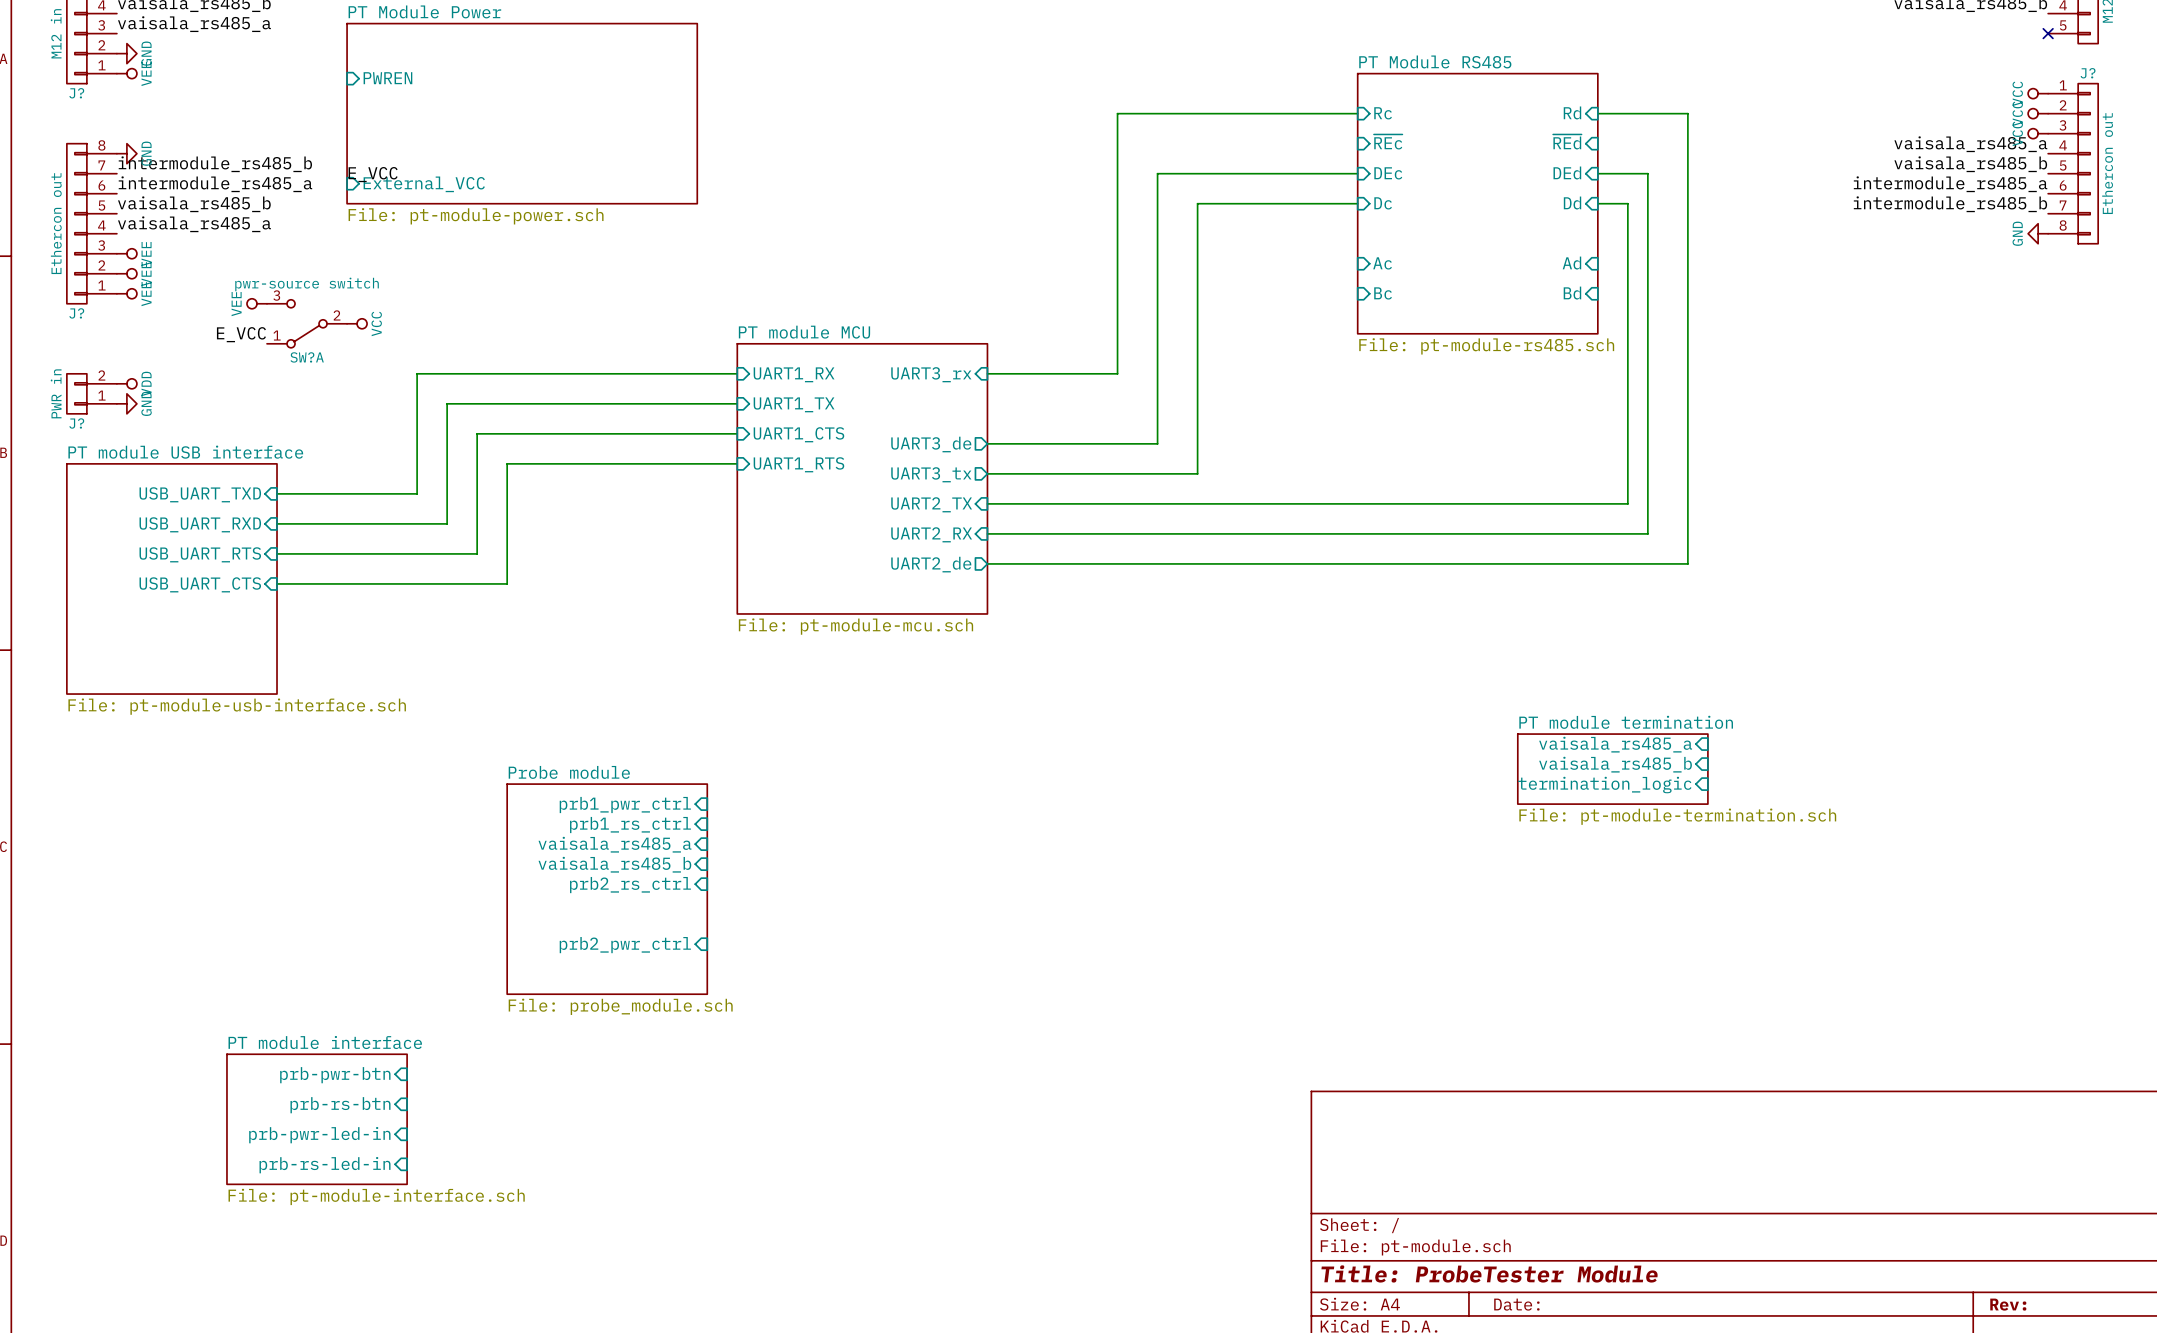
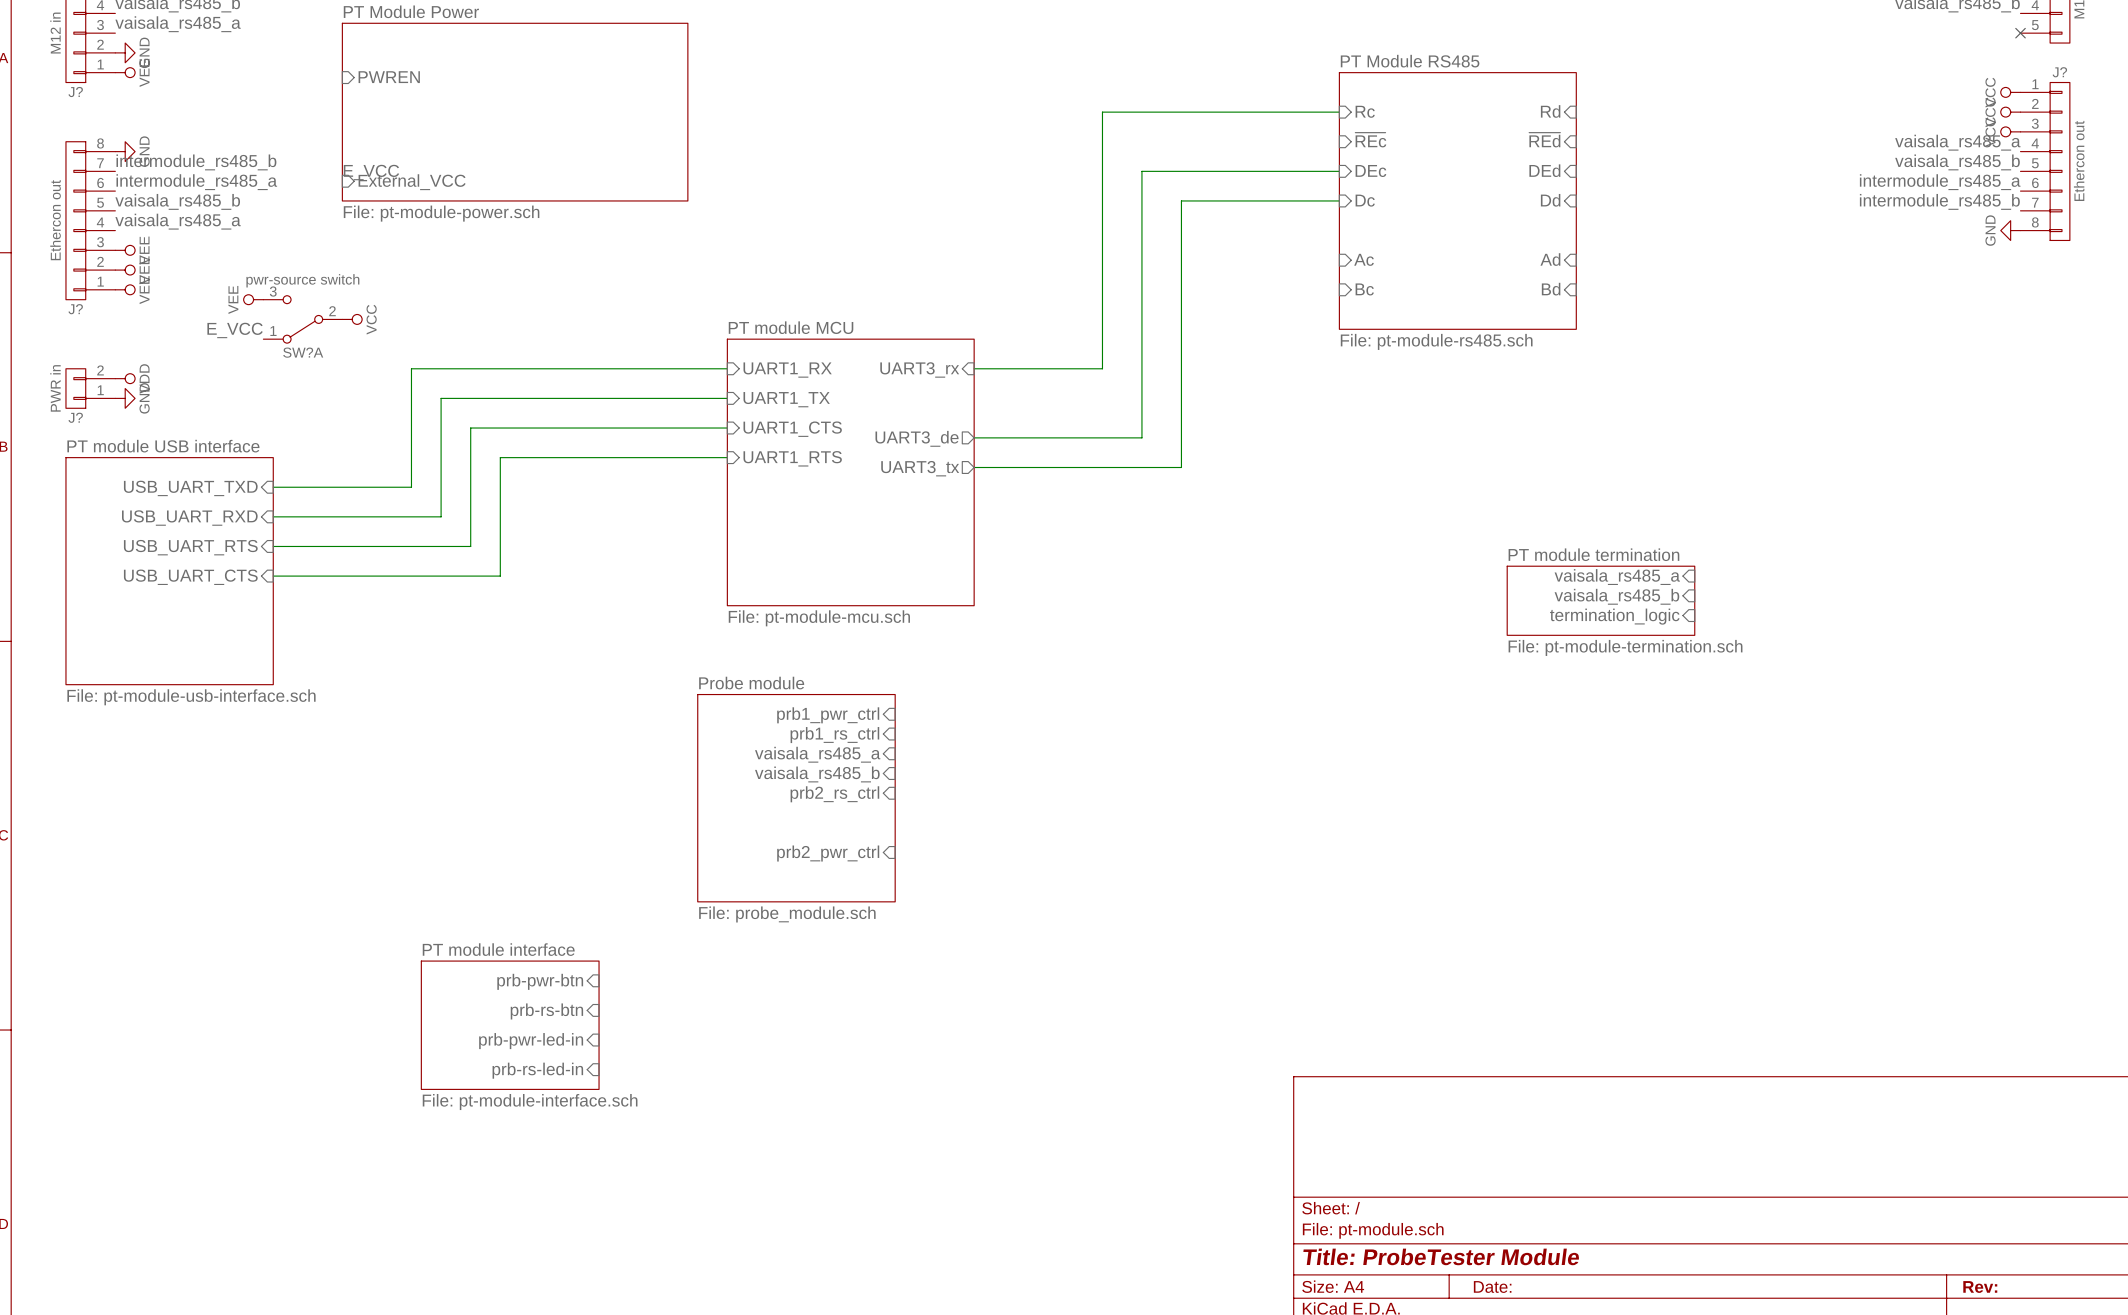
wire: (1597, 113) (1687, 113) (1687, 563) (987, 563) -> none
wire: (1597, 173) (1647, 173) (1647, 533) (987, 533) -> none
wire: (1597, 203) (1627, 203) (1627, 503) (987, 503) -> none
sheet pin: UART2_TX (931, 504) -> none
sheet pin: UART2_RX (931, 534) -> none
sheet pin: UART2_de (931, 564) -> none
sheet pin: none -> prb1_pwr_ctrl (828, 715)
sheet pin: none -> prb1_rs_ctrl (834, 735)
sheet pin position: vaisala_rs485_a (1615, 744) -> vaisala_rs485_a (1617, 577)
sheet pin: none -> vaisala_rs485_a (817, 754)
sheet pin position: vaisala_rs485_b (1615, 764) -> vaisala_rs485_b (1616, 596)
sheet PT module termination position: (1612, 769) -> (1600, 600)
sheet pin: none -> vaisala_rs485_b (817, 774)
sheet pin position: termination_logic (1604, 785) -> termination_logic (1614, 616)
sheet pin: prb1_pwr_ctrl (625, 805) -> none
sheet pin: none -> prb2_rs_ctrl (834, 794)
sheet Probe module: none -> File: probe_module.sch (796, 798)
sheet pin: prb1_rs_ctrl (630, 825) -> none
sheet pin: vaisala_rs485_a (614, 844) -> none
sheet pin: vaisala_rs485_b (614, 864) -> none
sheet pin: none -> prb2_pwr_ctrl (828, 853)
sheet pin: prb2_rs_ctrl (630, 885) -> none
sheet Probe module: File: probe_module.sch (607, 889) -> none
sheet pin: prb2_pwr_ctrl (625, 945) -> none
sheet pin: none -> prb-pwr-btn (540, 981)
sheet pin: none -> prb-rs-btn (546, 1011)
sheet PT module interface: none -> File: pt-module-interface.sch (510, 1025)
sheet pin: none -> prb-pwr-led-in (531, 1041)
sheet pin: prb-pwr-btn (335, 1075) -> none
sheet pin: none -> prb-rs-led-in (537, 1070)
sheet pin: prb-rs-btn (340, 1105) -> none
sheet PT module interface: File: pt-module-interface.sch (317, 1119) -> none
sheet pin: prb-pwr-led-in (319, 1135) -> none
sheet pin: prb-rs-led-in (325, 1165) -> none

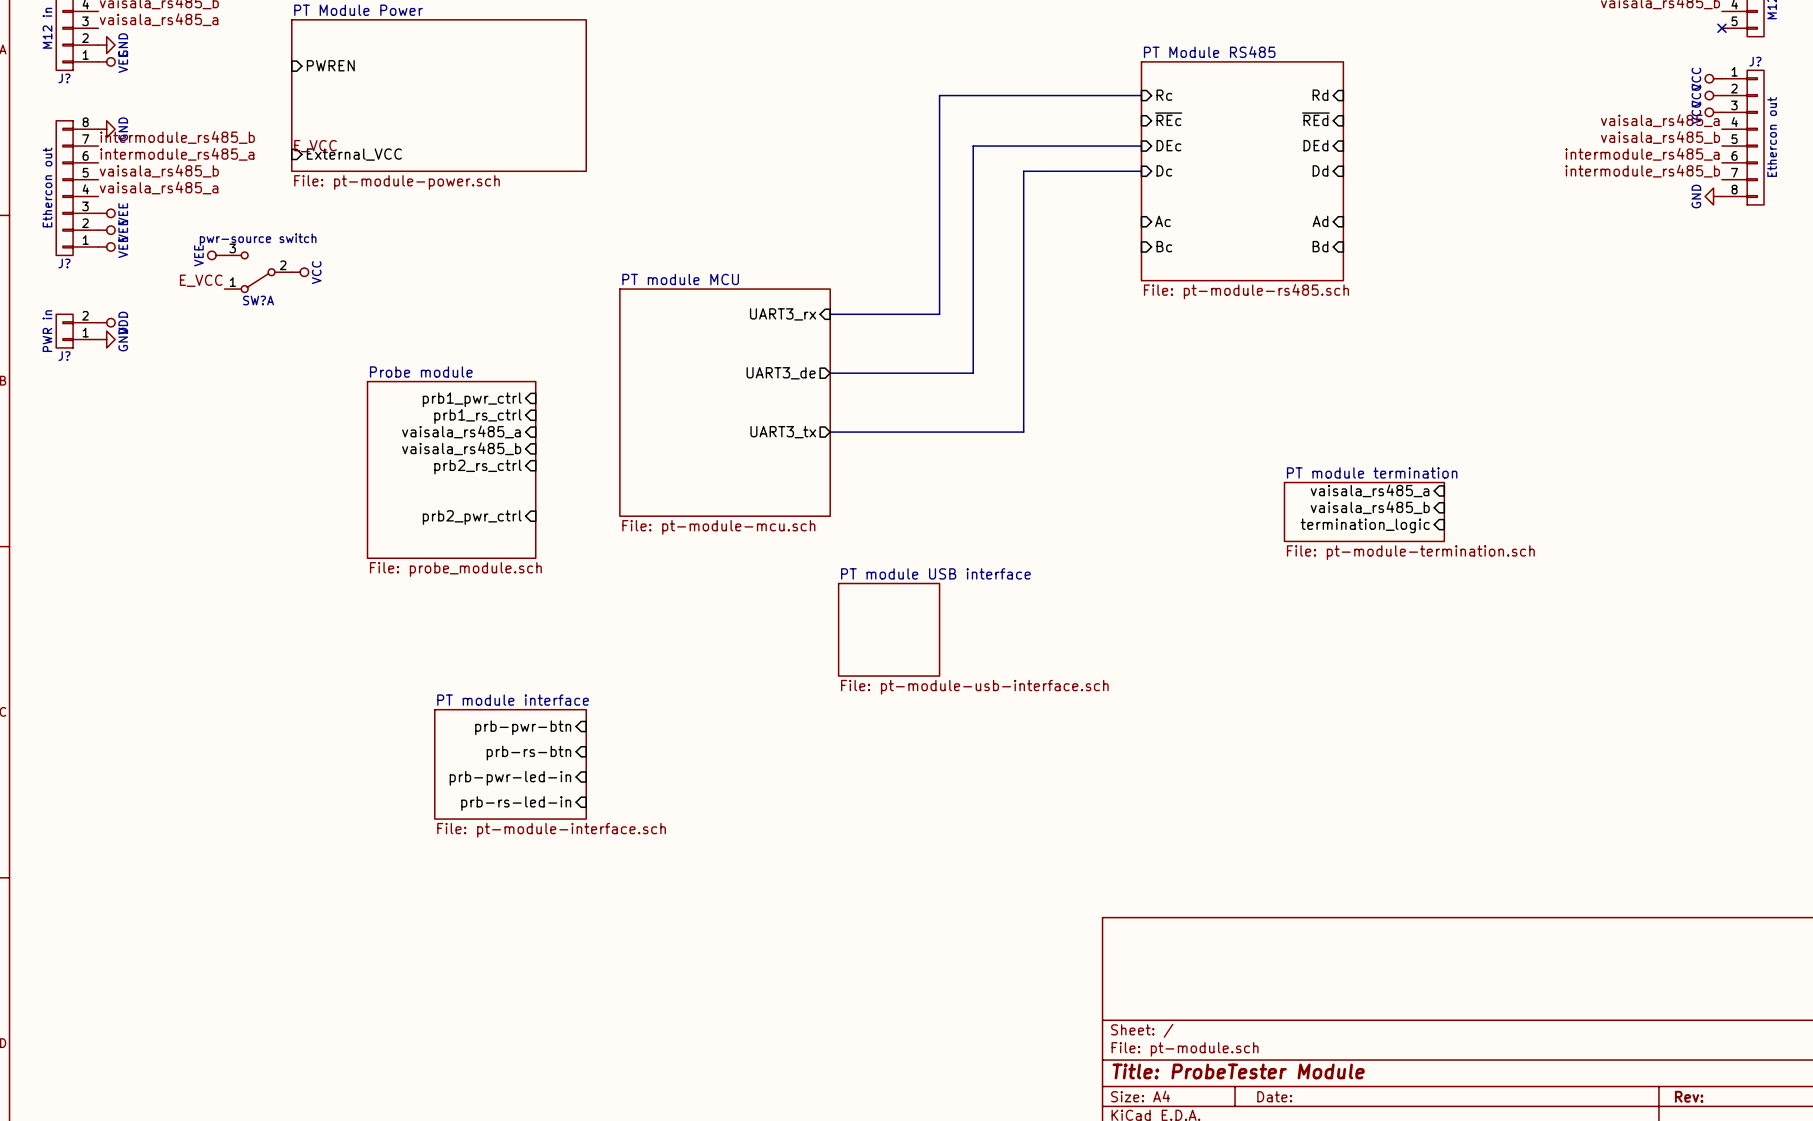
wire: (1201, 200) (1181, 200) (1181, 467) (974, 467) -> (1023, 171) (1023, 432) (830, 432)
wire: (727, 368) (411, 368) (411, 487) (273, 487) -> none
sheet pin: UART1_RX (787, 370) -> none
wire: (727, 398) (441, 398) (441, 516) (273, 516) -> none
sheet pin: UART1_TX (786, 399) -> none
wire: (727, 428) (470, 428) (470, 546) (273, 546) -> none
sheet pin: UART1_CTS (792, 429) -> none
wire: (727, 457) (500, 457) (500, 576) (273, 576) -> none
sheet pin: UART1_RTS (792, 458) -> none
sheet pin: none -> prb1_pwr_ctrl (472, 399)
sheet pin position: UART3_tx (920, 468) -> UART3_tx (783, 432)
sheet pin: USB_UART_TXD (190, 488) -> none
sheet pin: none -> prb1_rs_ctrl (478, 416)
sheet pin: none -> vaisala_rs485_a (461, 431)
sheet pin: USB_UART_RXD (189, 518) -> none
sheet pin: none -> vaisala_rs485_b (461, 448)
sheet pin: USB_UART_RTS (190, 547) -> none
sheet pin: none -> prb2_rs_ctrl (478, 467)
sheet Probe module: none -> File: probe_module.sch (451, 469)
sheet PT module USB interface: File: pt-module-usb-interface.sch (169, 571) -> none
sheet pin: USB_UART_CTS (190, 577) -> none
sheet pin: none -> prb2_pwr_ctrl (472, 517)
sheet pin: prb1_pwr_ctrl (828, 715) -> none
sheet pin: prb1_rs_ctrl (834, 735) -> none
sheet PT module USB interface: none -> File: pt-module-usb-interface.sch (889, 629)
sheet pin: vaisala_rs485_a (817, 754) -> none
sheet pin: vaisala_rs485_b (817, 774) -> none
sheet pin: prb2_rs_ctrl (834, 794) -> none
sheet Probe module: File: probe_module.sch (796, 798) -> none
sheet pin: prb2_pwr_ctrl (828, 853) -> none
sheet pin position: prb-pwr-btn (540, 981) -> prb-pwr-btn (523, 727)
sheet pin position: prb-rs-btn (546, 1011) -> prb-rs-btn (528, 753)
sheet PT module interface position: (510, 1025) -> (510, 764)
sheet pin position: prb-pwr-led-in (531, 1041) -> prb-pwr-led-in (510, 778)
sheet pin position: prb-rs-led-in (537, 1070) -> prb-rs-led-in (516, 803)

